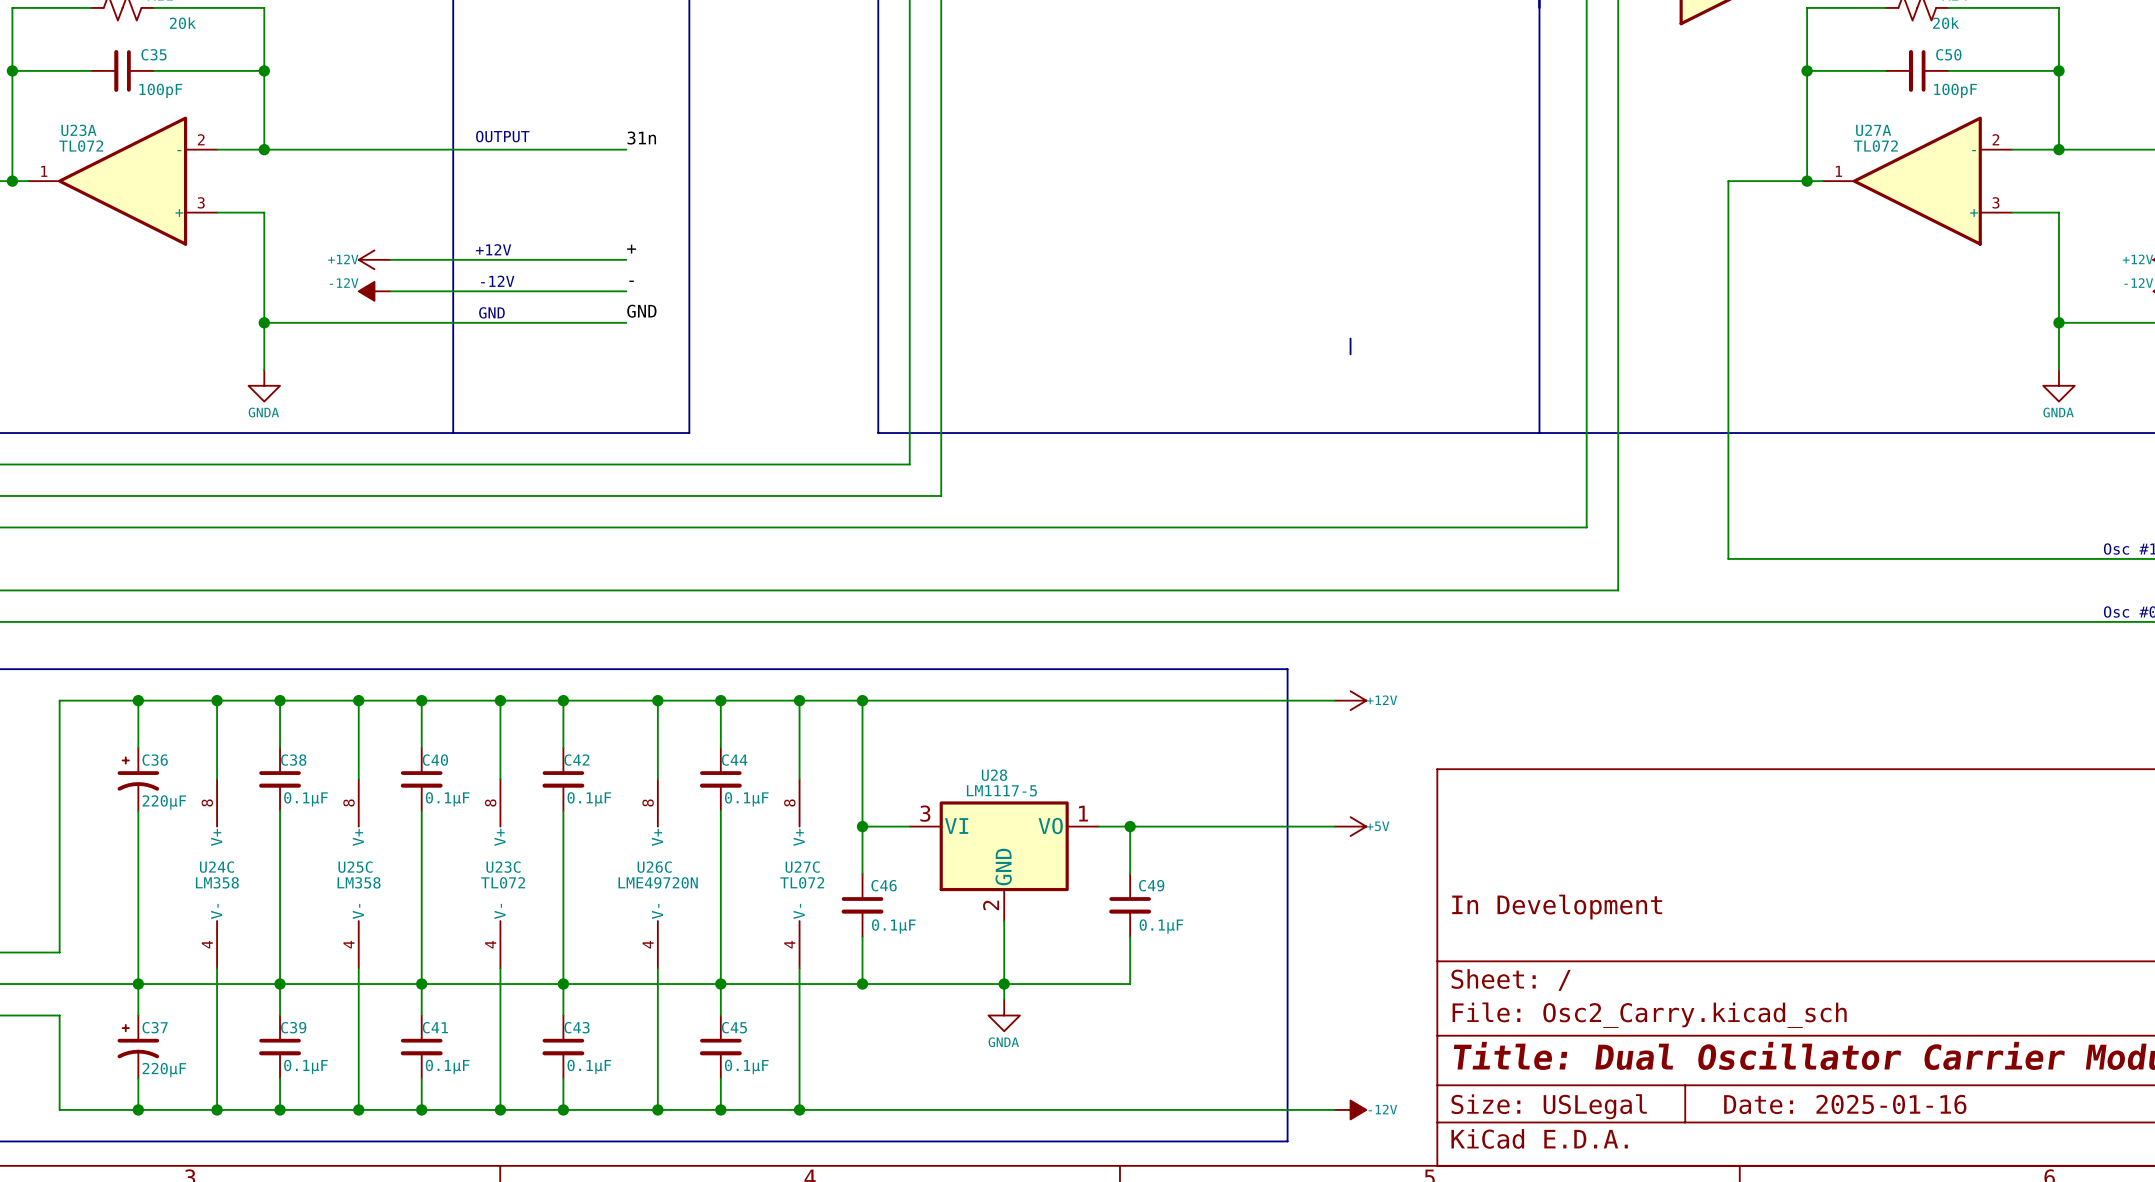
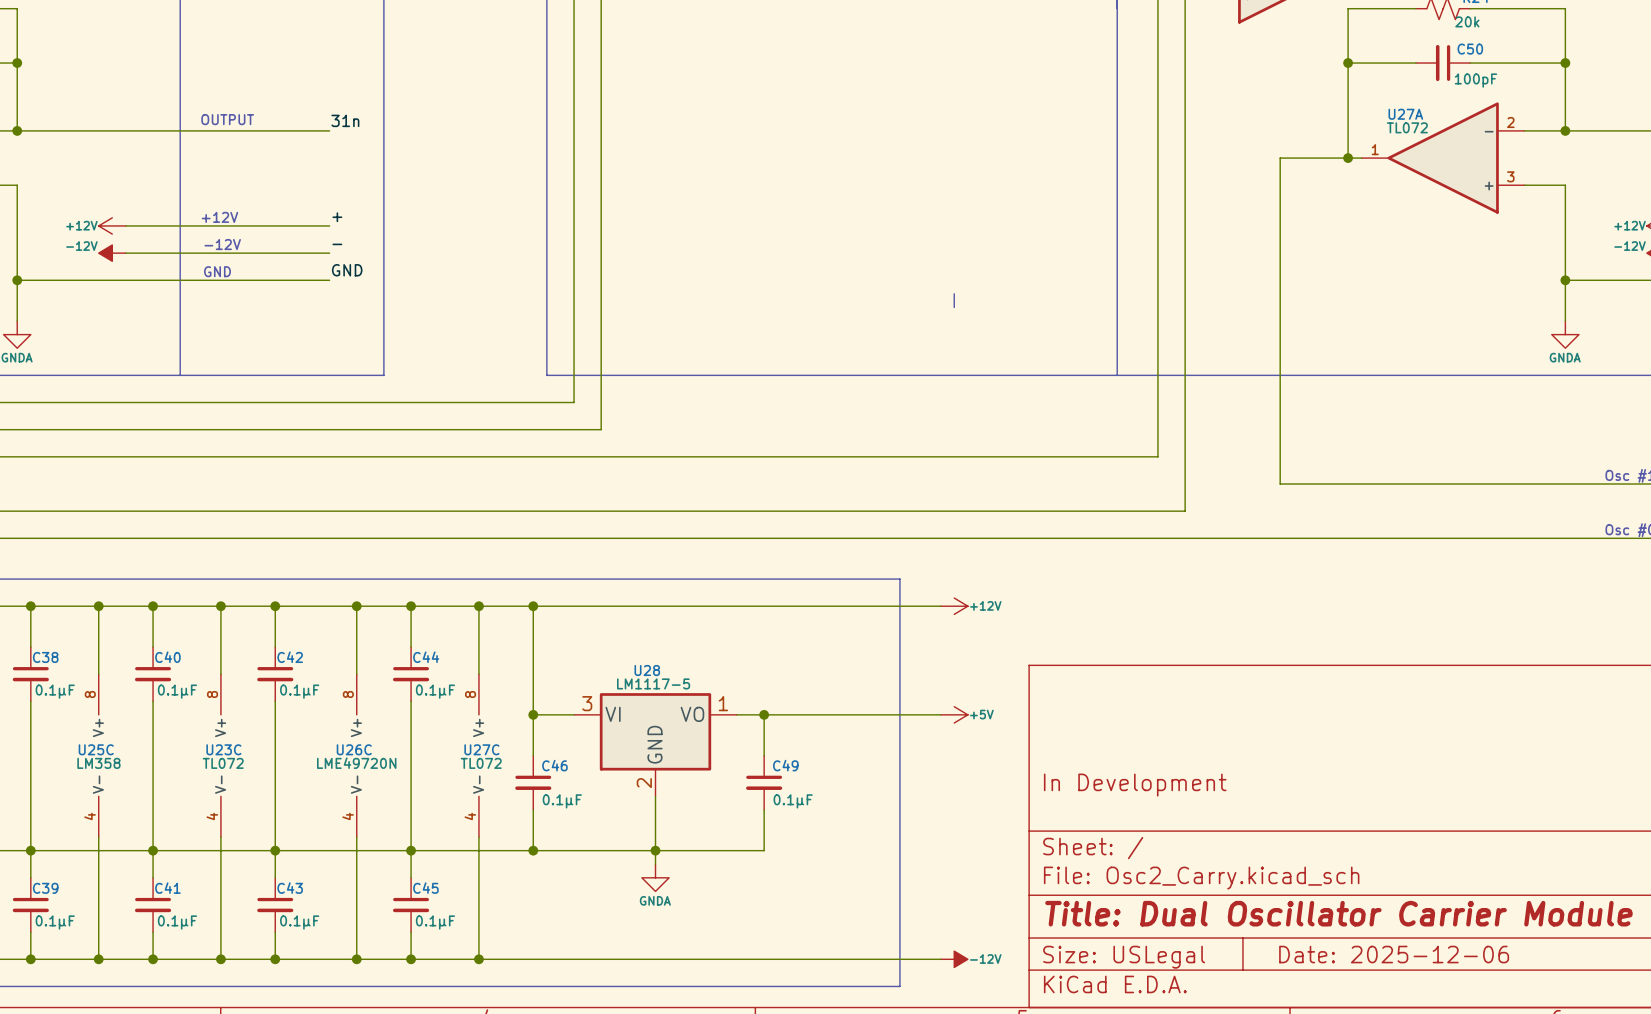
title block: Date: 2025-01-16 (1845, 1104) -> Date: 2025-12-06 (1394, 954)

